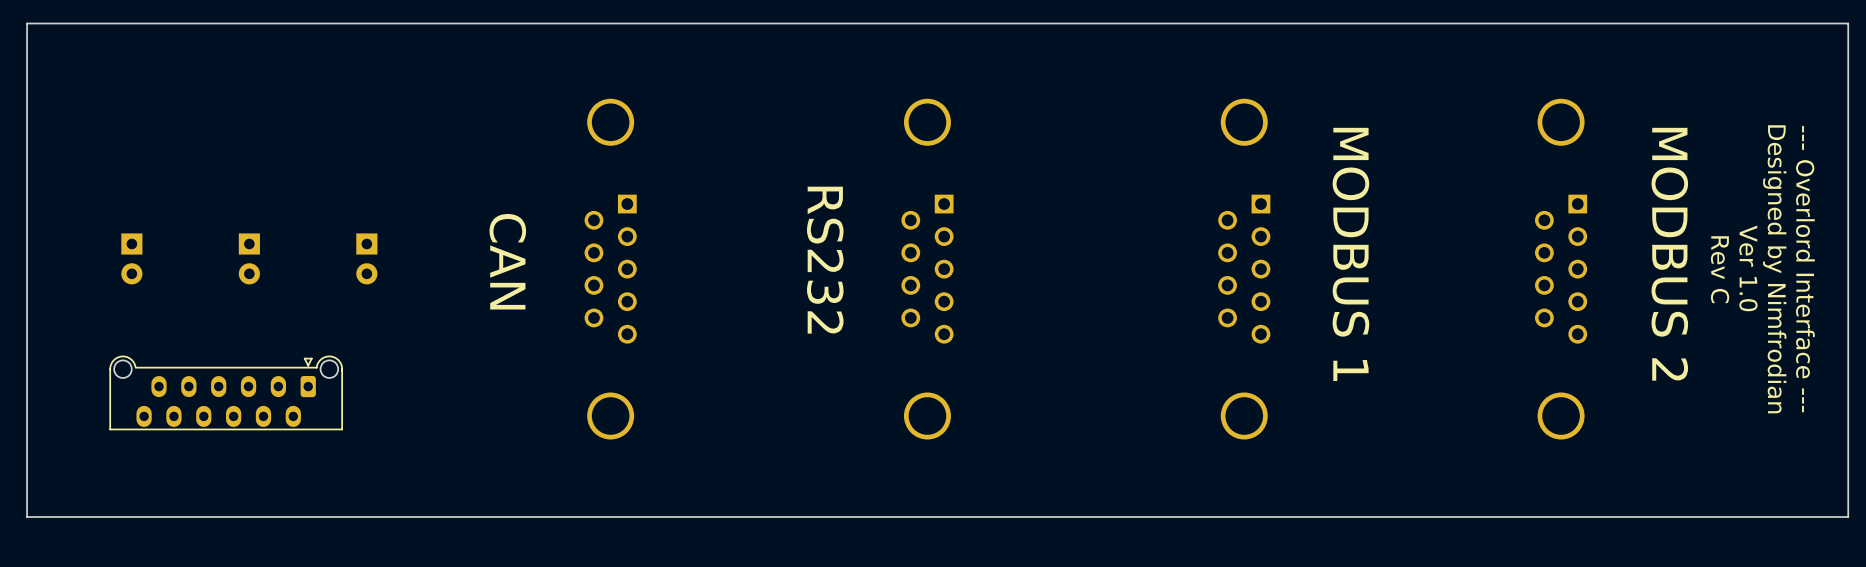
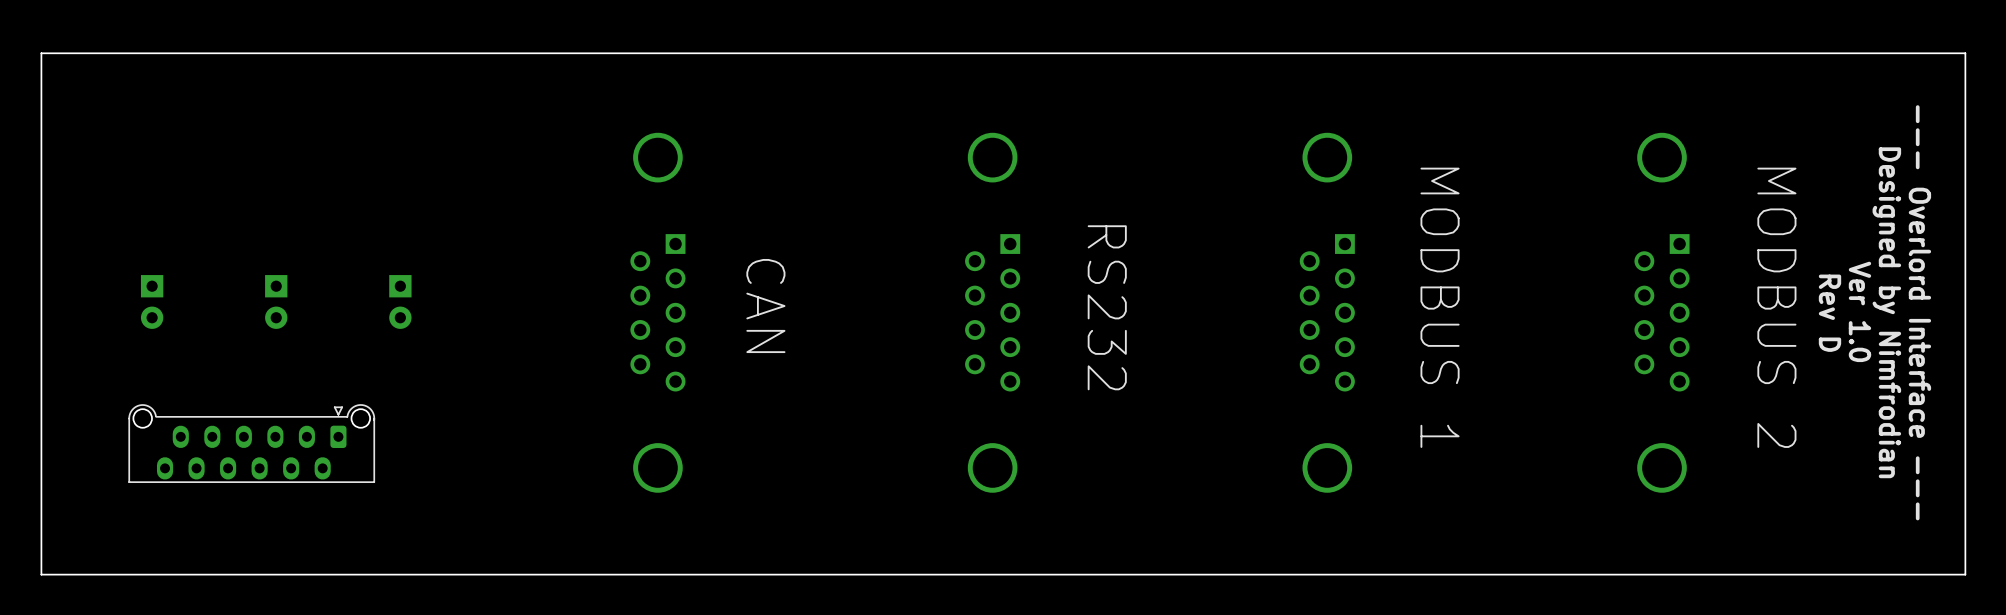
text position: RS232 (825, 260) -> RS232 (1107, 307)
text position: CAN (507, 261) -> CAN (765, 306)
text: Rev C (1720, 269) -> Rev D (1829, 313)

